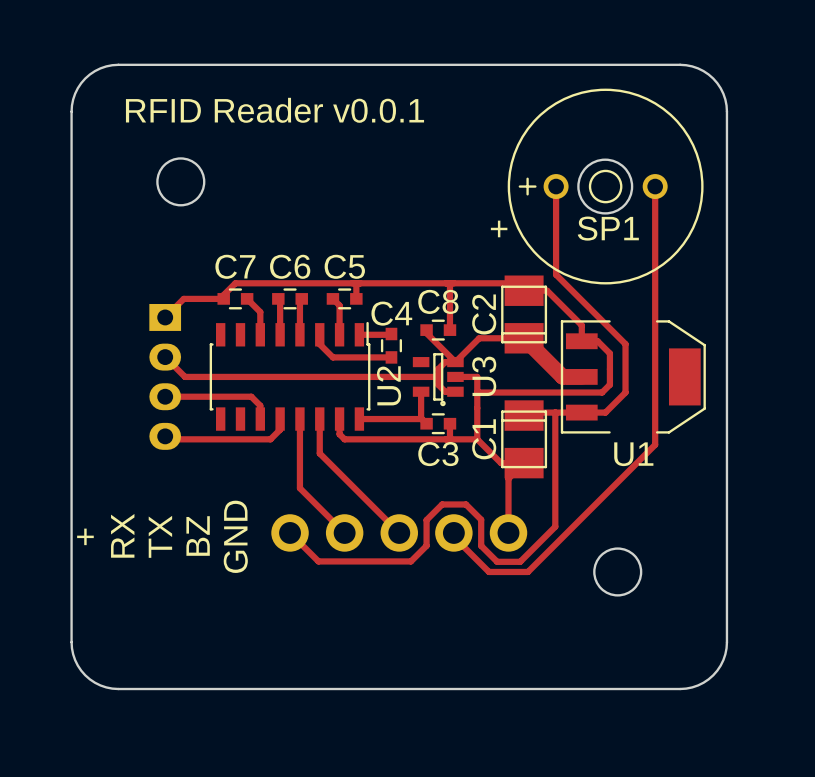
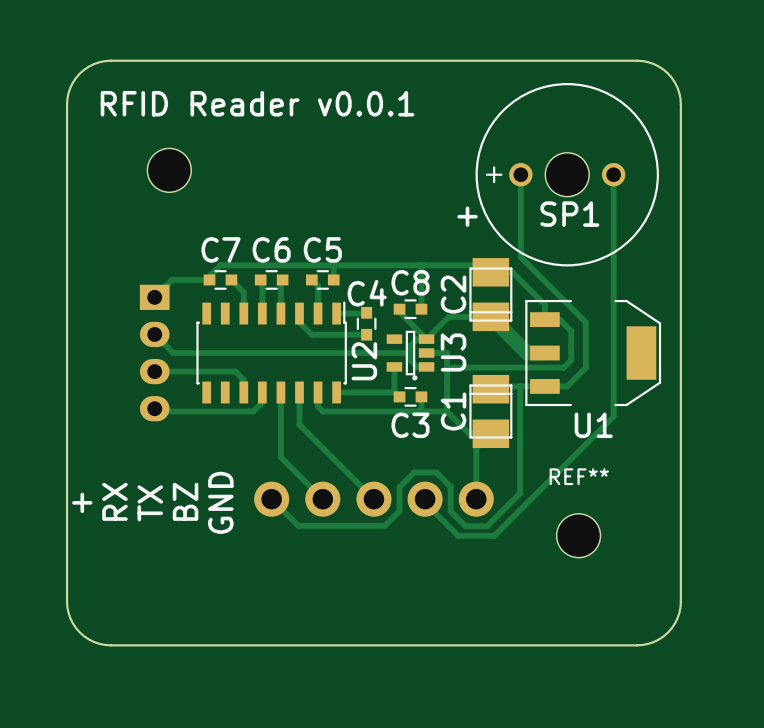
SP1 footprint: [507, 88, 704, 285] -> [475, 83, 659, 267]
round board edge: [156, 157, 206, 207] -> none
round board edge: [577, 158, 634, 215] -> none
part: none -> (169, 170)
round board edge: [593, 547, 643, 597] -> none
REF**: none -> (578, 535)

